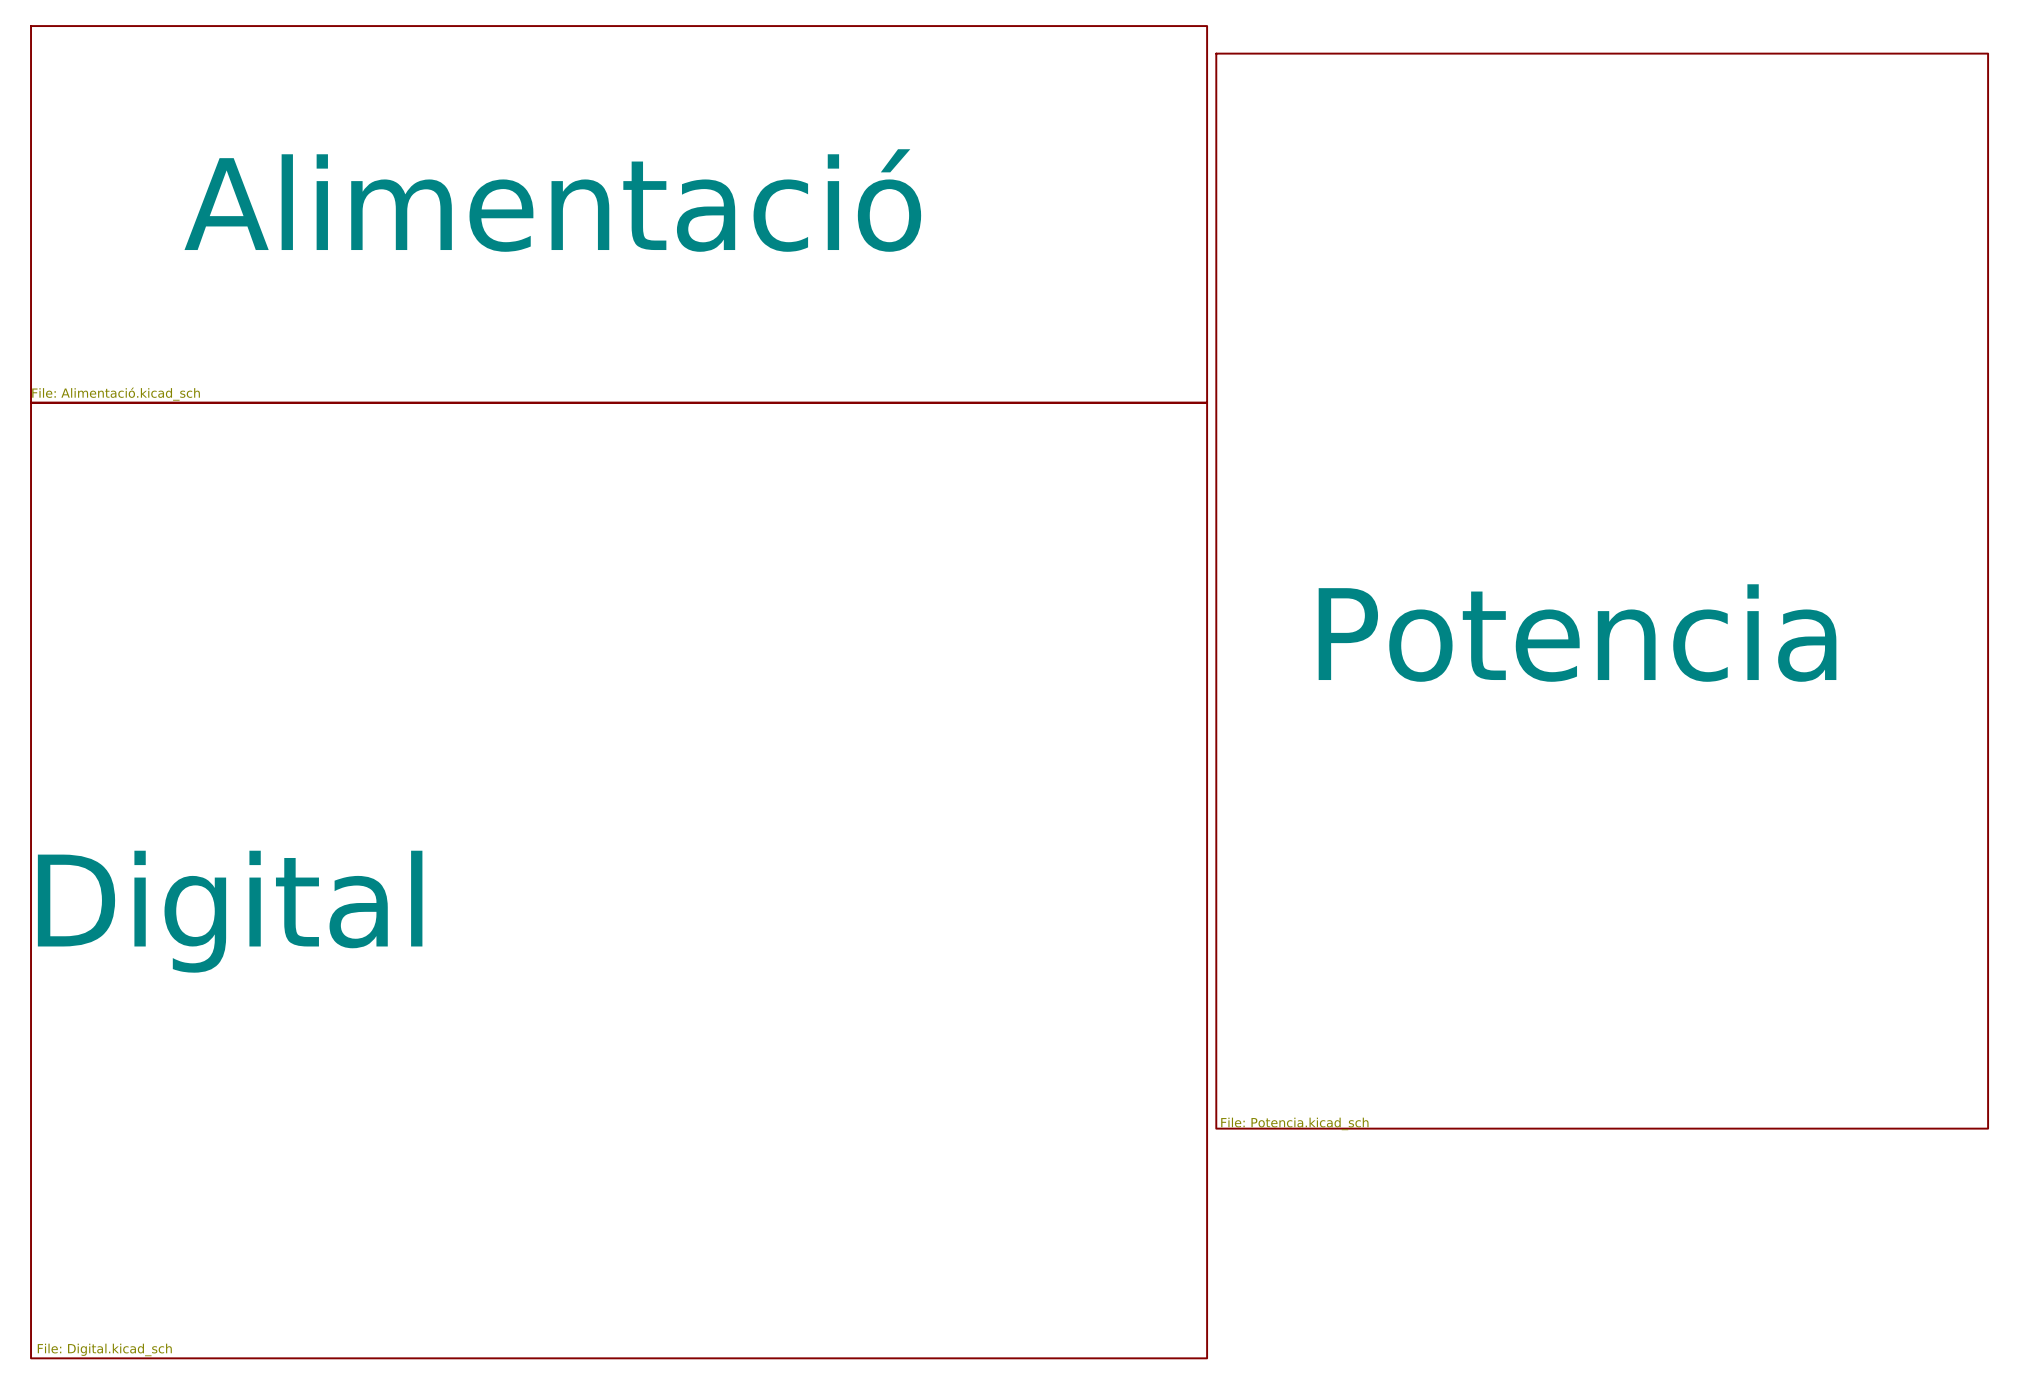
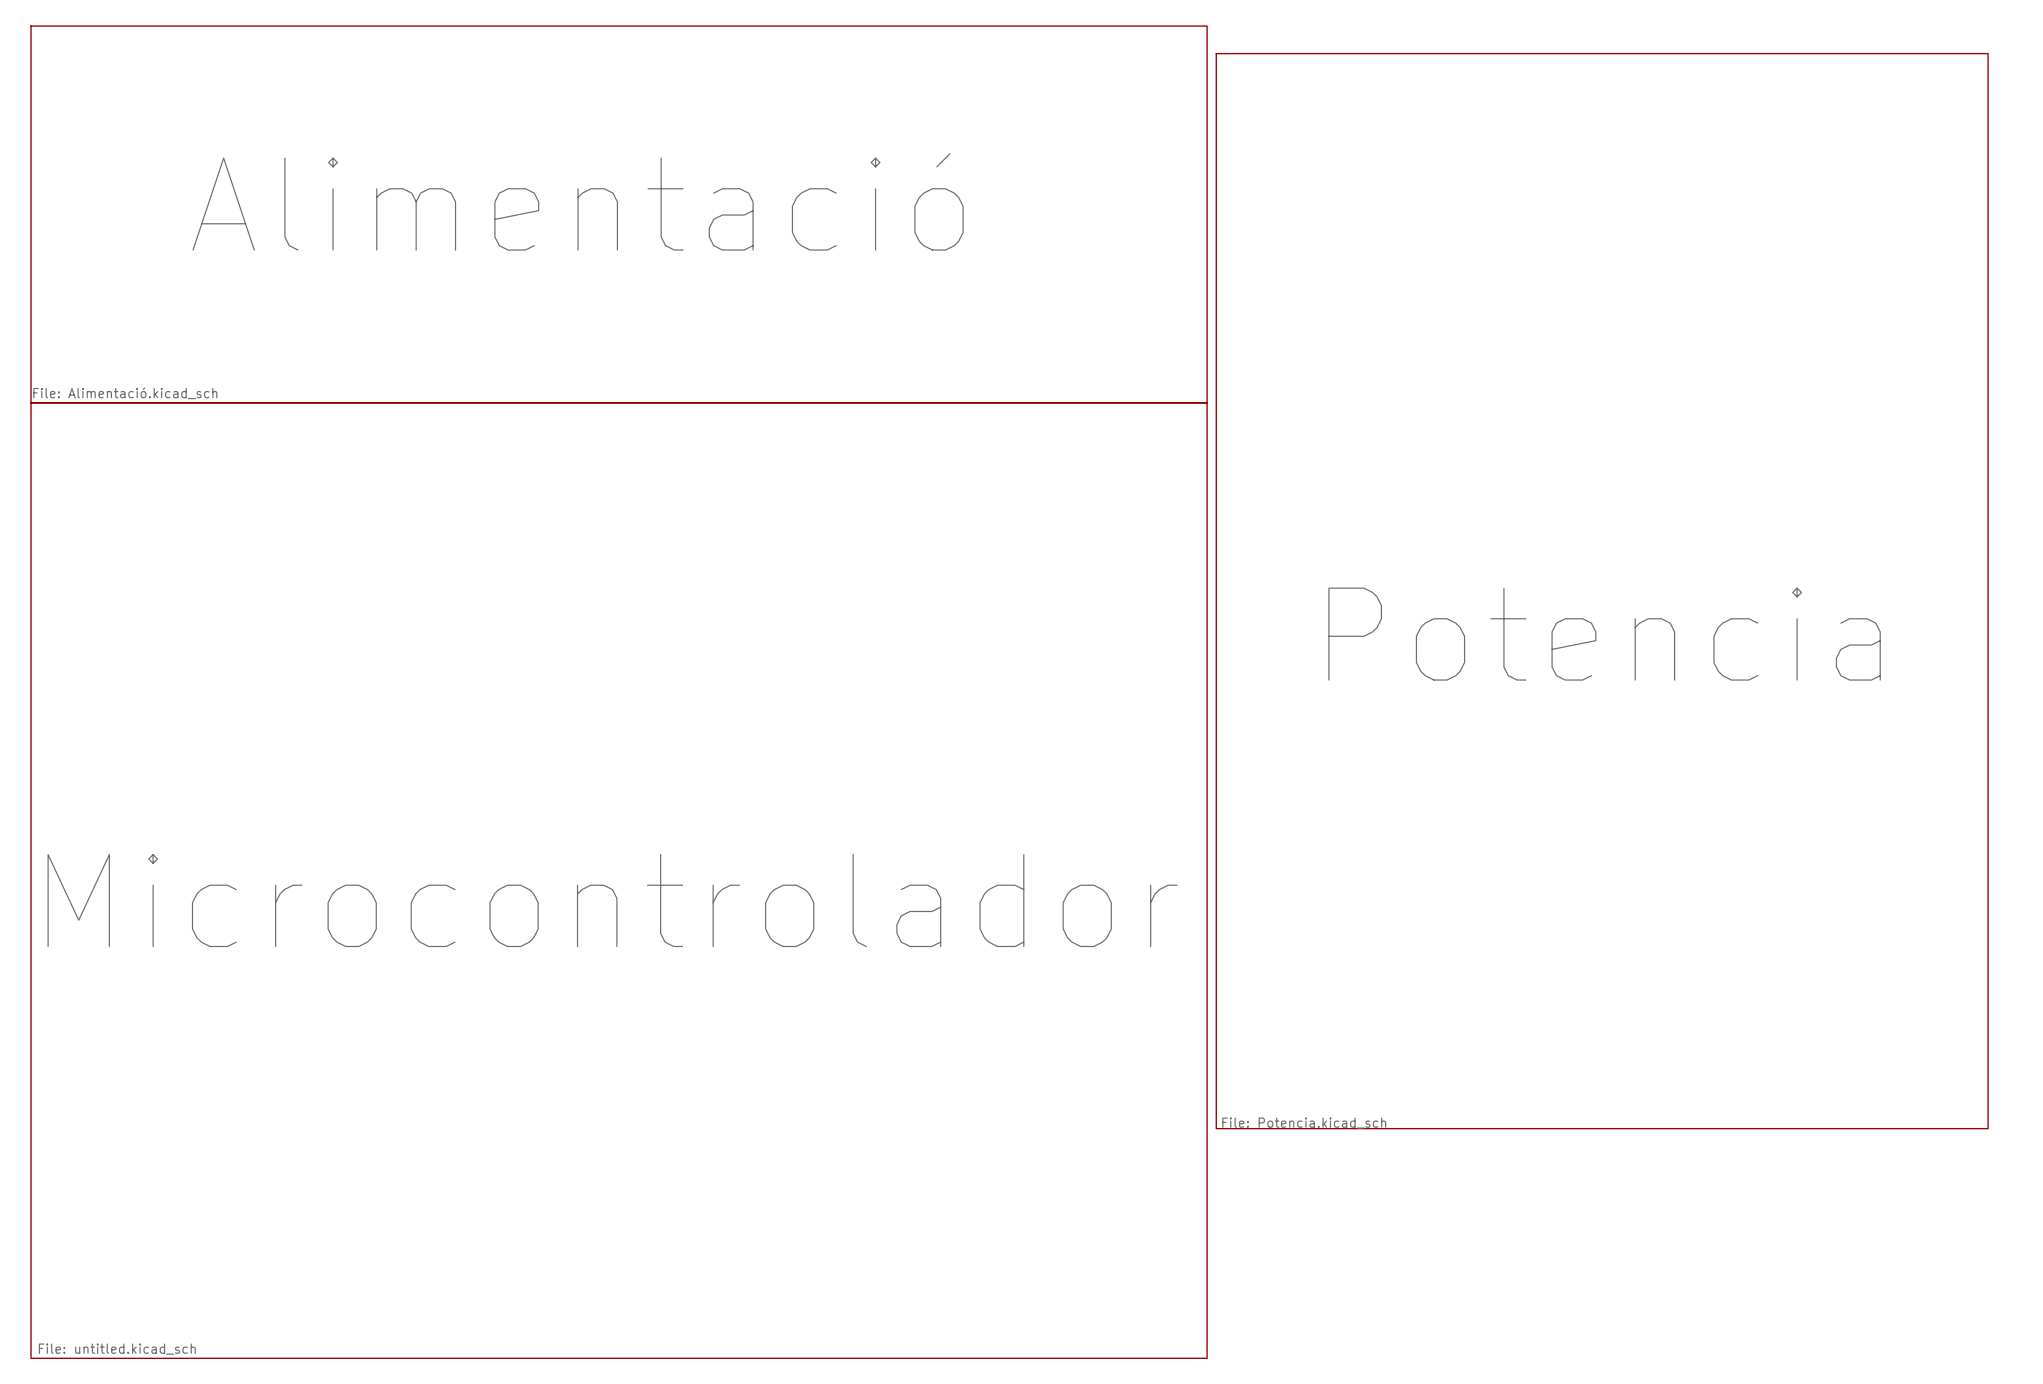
sheet Digital name: Digital (230, 911) -> Microcontrolador (612, 900)
sheet Digital value: File: Digital.kicad_sch (104, 1349) -> File: untitled.kicad_sch (117, 1349)

